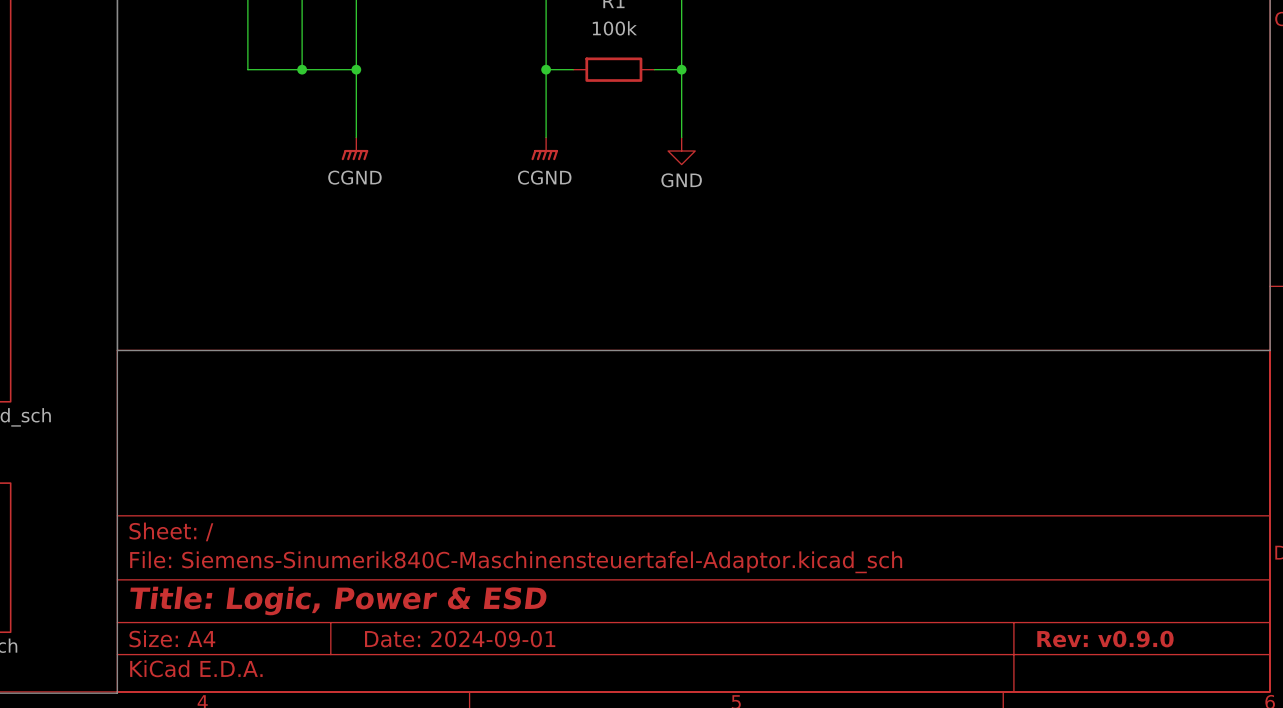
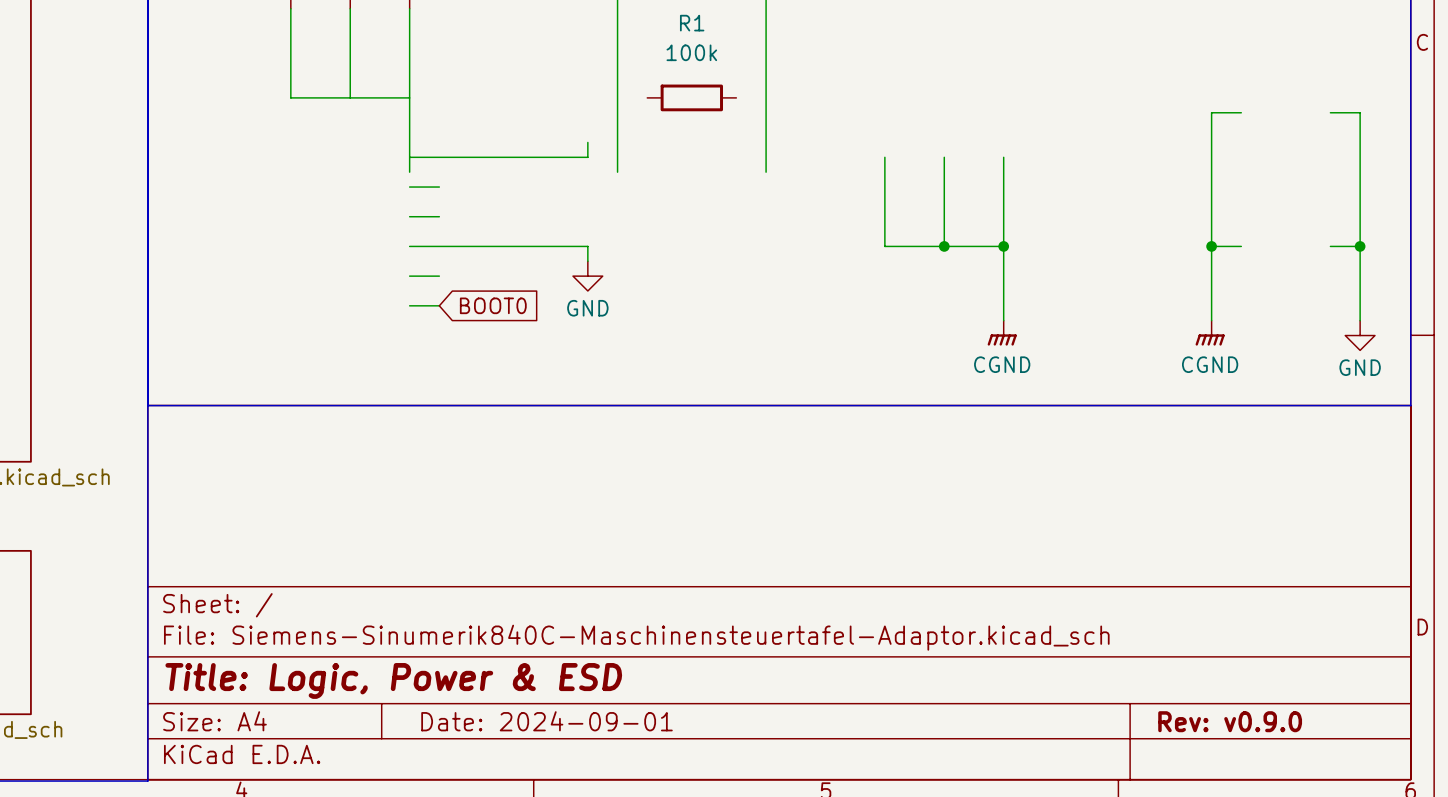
junction: (302, 69) -> none
junction: (356, 69) -> none
wire: (546, 69) (573, 69) -> (409, 187) (439, 187)
junction: (546, 69) -> none
wire: (654, 69) (681, 69) -> none
junction: (681, 69) -> none
wire: none -> (1241, 112) (1211, 112) (1211, 320)
wire: none -> (1330, 112) (1360, 112) (1360, 320)
wire: none -> (587, 142) (587, 157) (409, 157)
wire: none -> (884, 157) (884, 246) (1003, 246)
wire: none -> (944, 157) (944, 246)
wire: none -> (1003, 157) (1003, 320)
power symbol: CGND (354, 148) -> none
power symbol: CGND (544, 148) -> none
power symbol: GND (681, 151) -> none
wire: none -> (409, 216) (439, 216)
wire: none -> (409, 246) (587, 246) (587, 261)
junction: none -> (944, 246)
junction: none -> (1003, 246)
wire: none -> (1211, 246) (1241, 246)
junction: none -> (1211, 246)
wire: none -> (1330, 246) (1360, 246)
junction: none -> (1360, 246)
wire: none -> (409, 276) (439, 276)
power symbol: none -> GND (587, 276)
wire: none -> (409, 305) (439, 305)
global label: none -> BOOT0 (493, 305)
power symbol: none -> CGND (1002, 333)
power symbol: none -> CGND (1210, 333)
power symbol: none -> GND (1360, 335)

